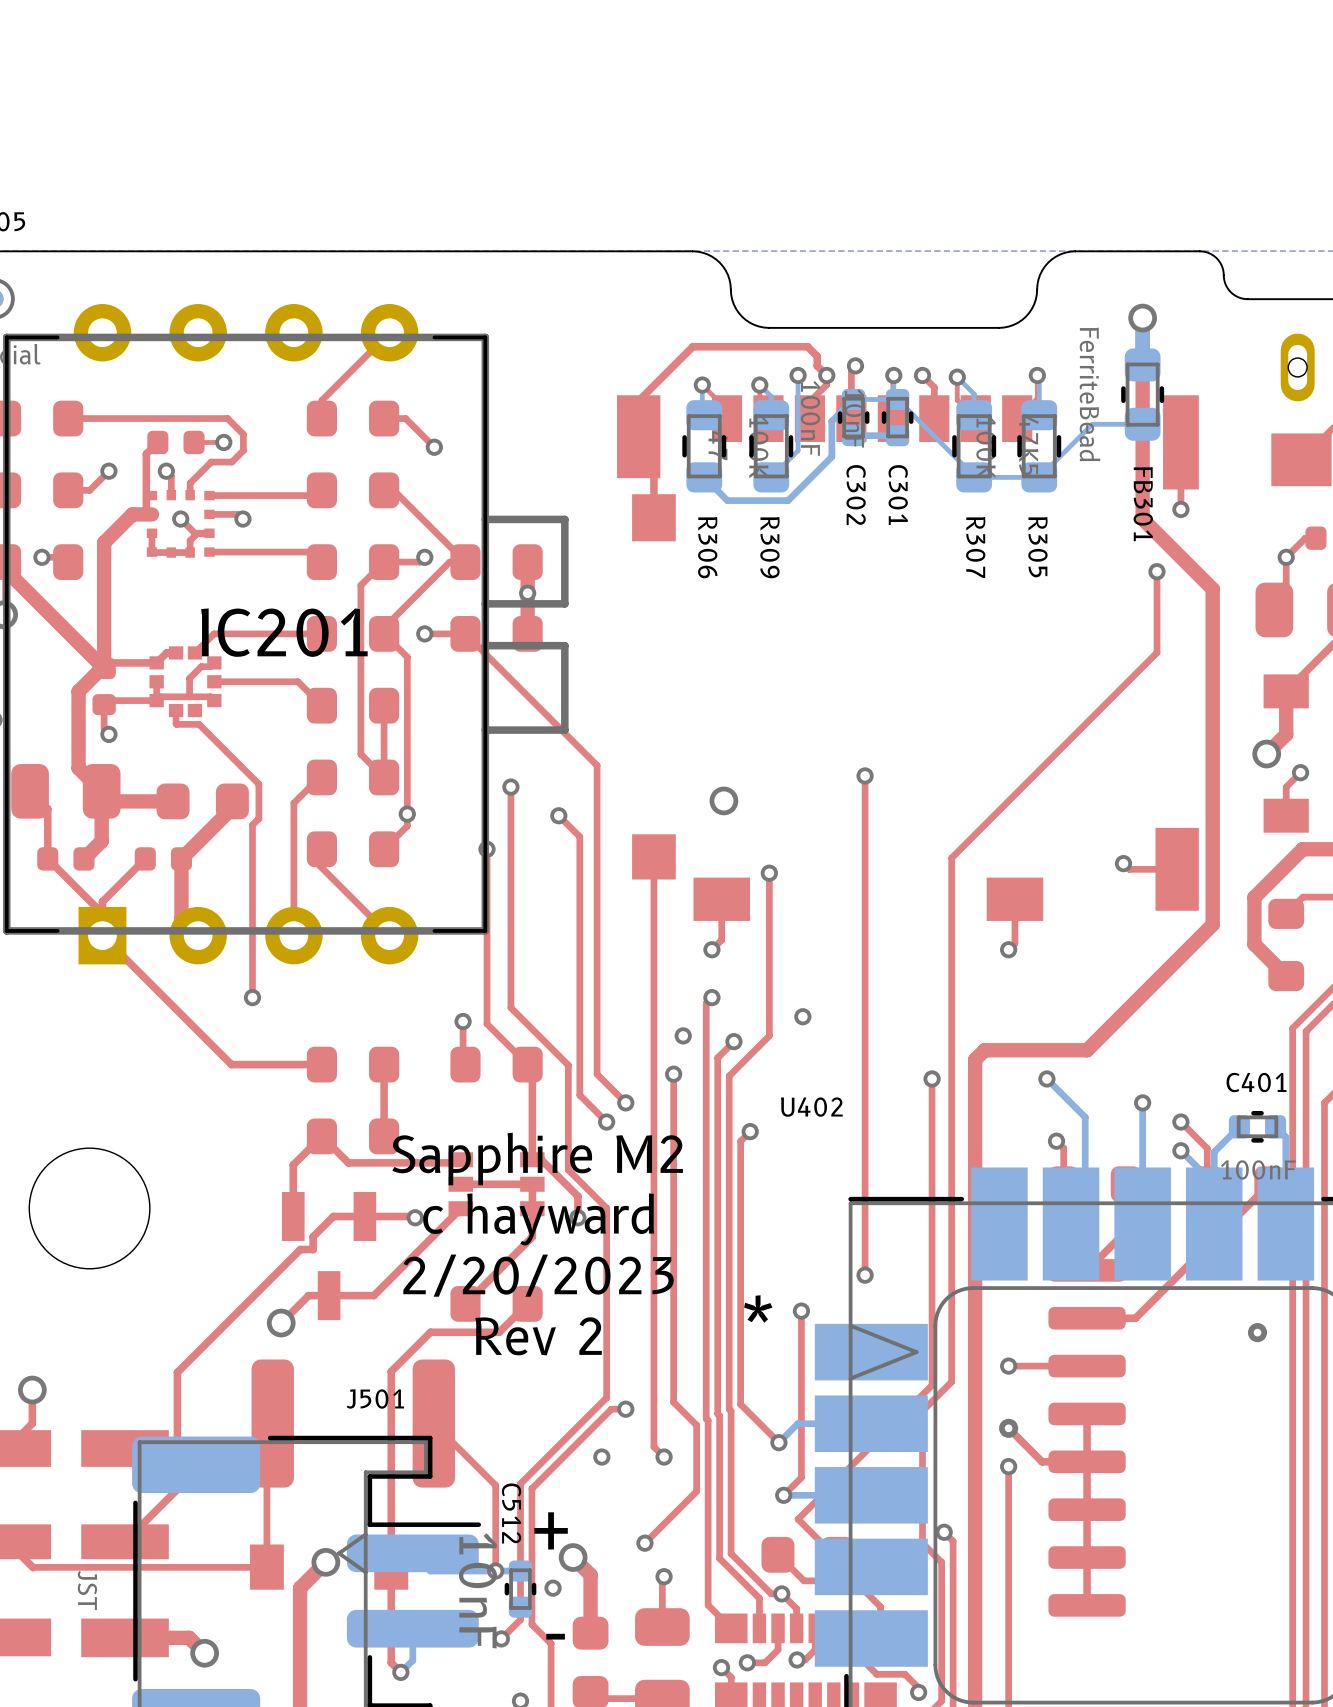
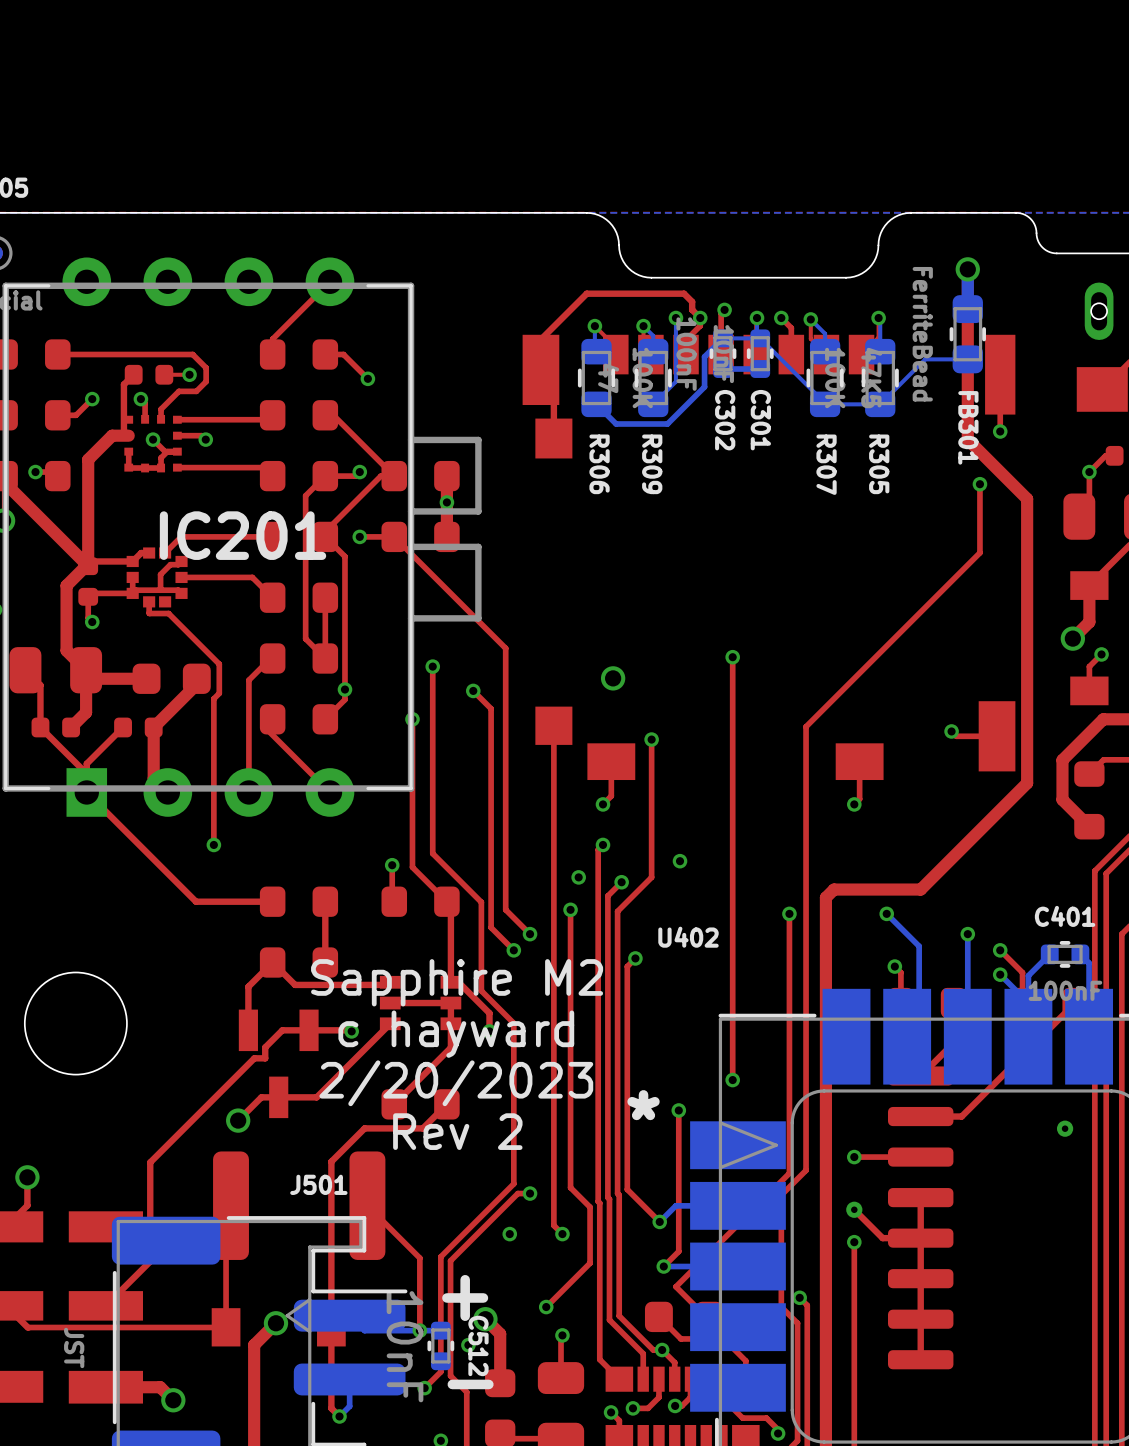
C512 name position: C512 (511, 1513) -> C512 (478, 1345)

